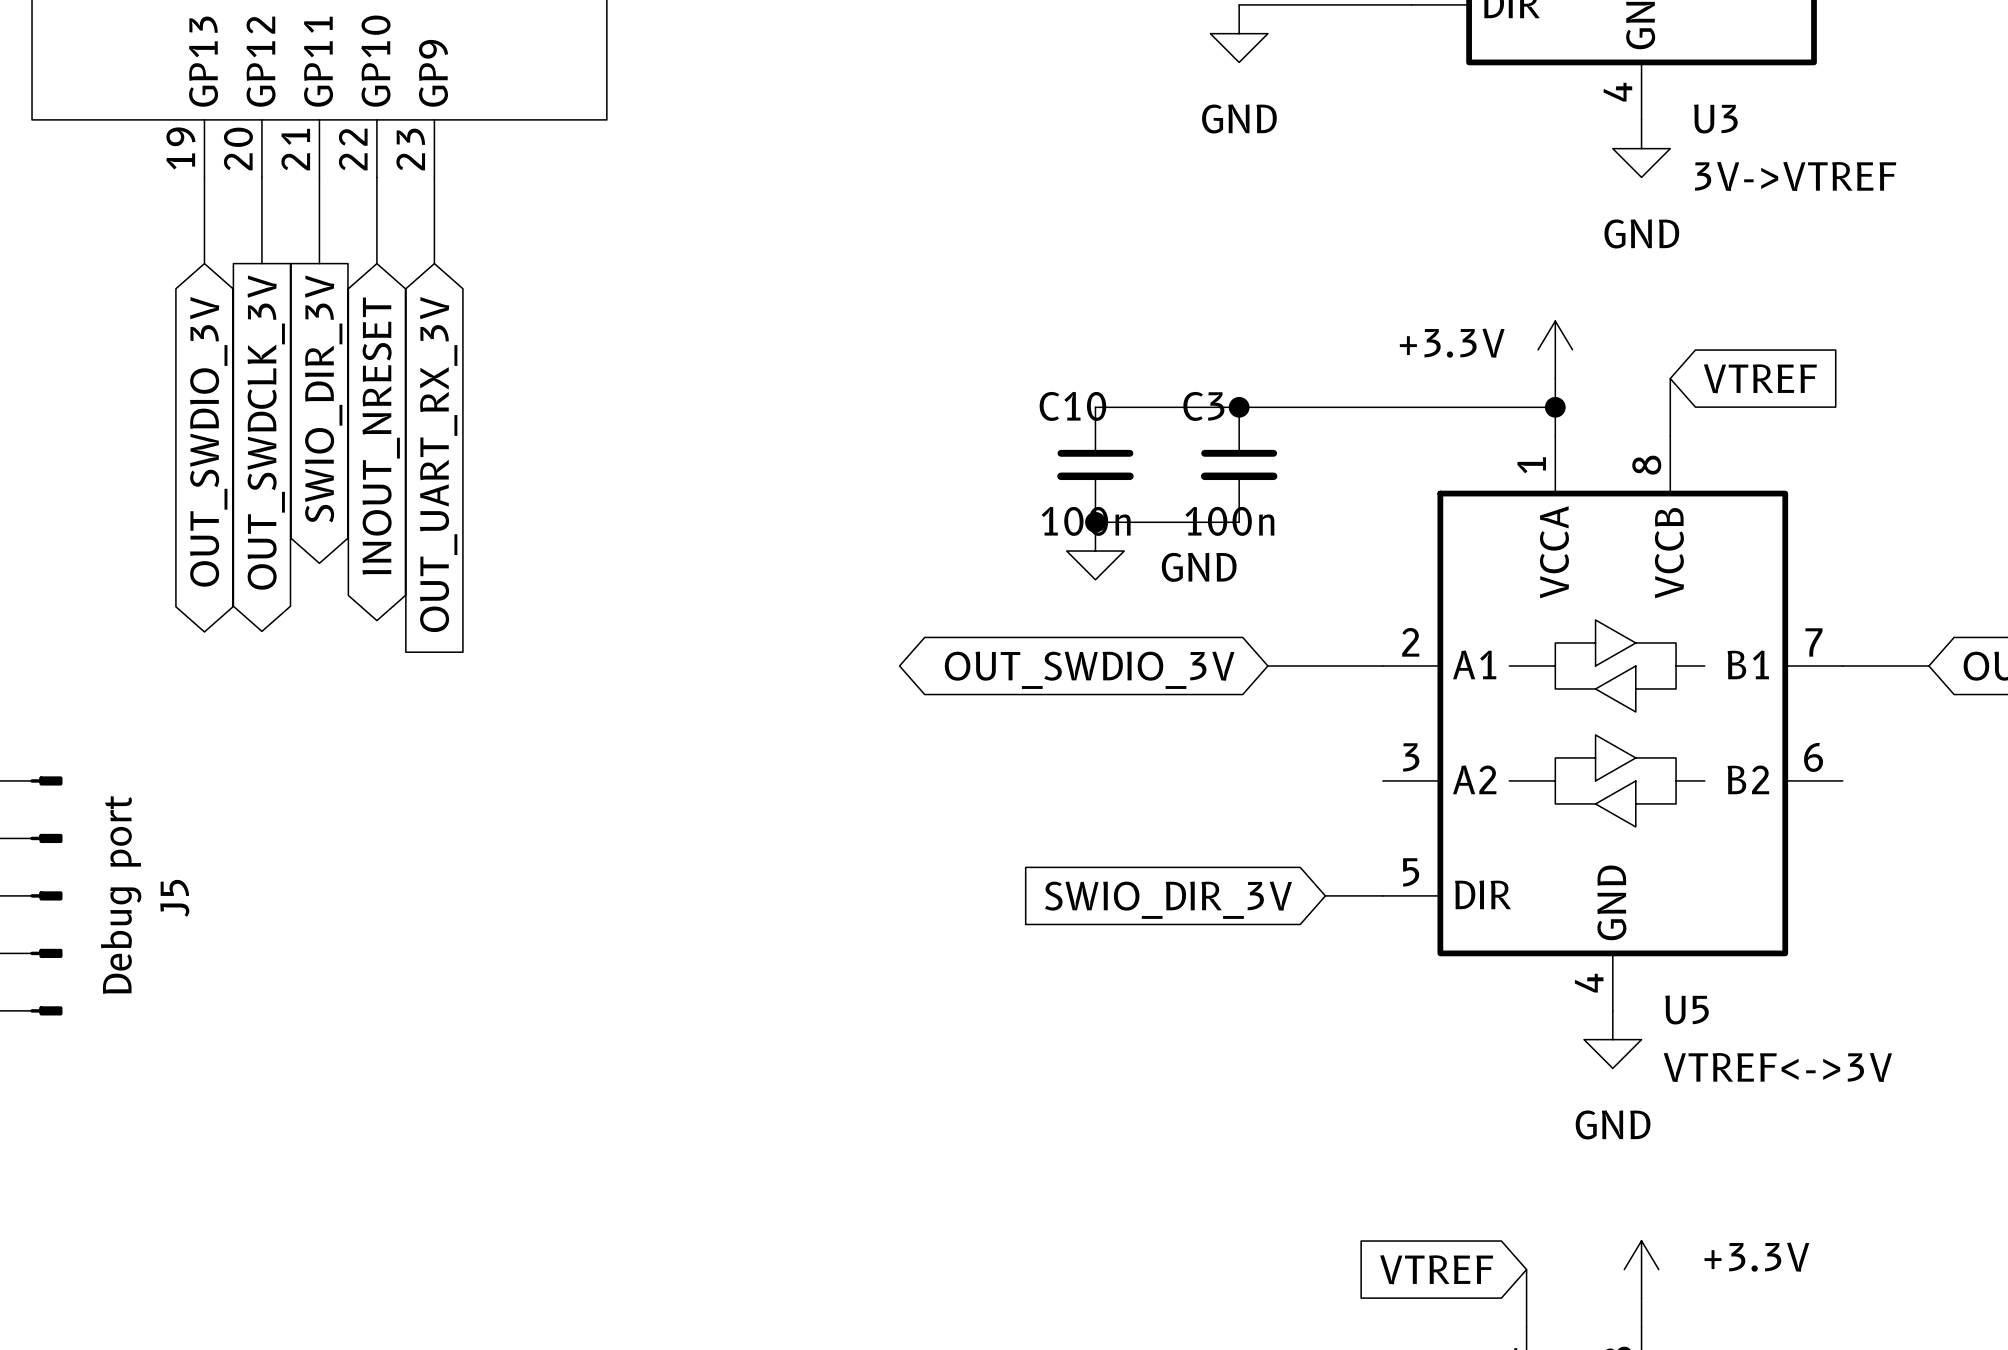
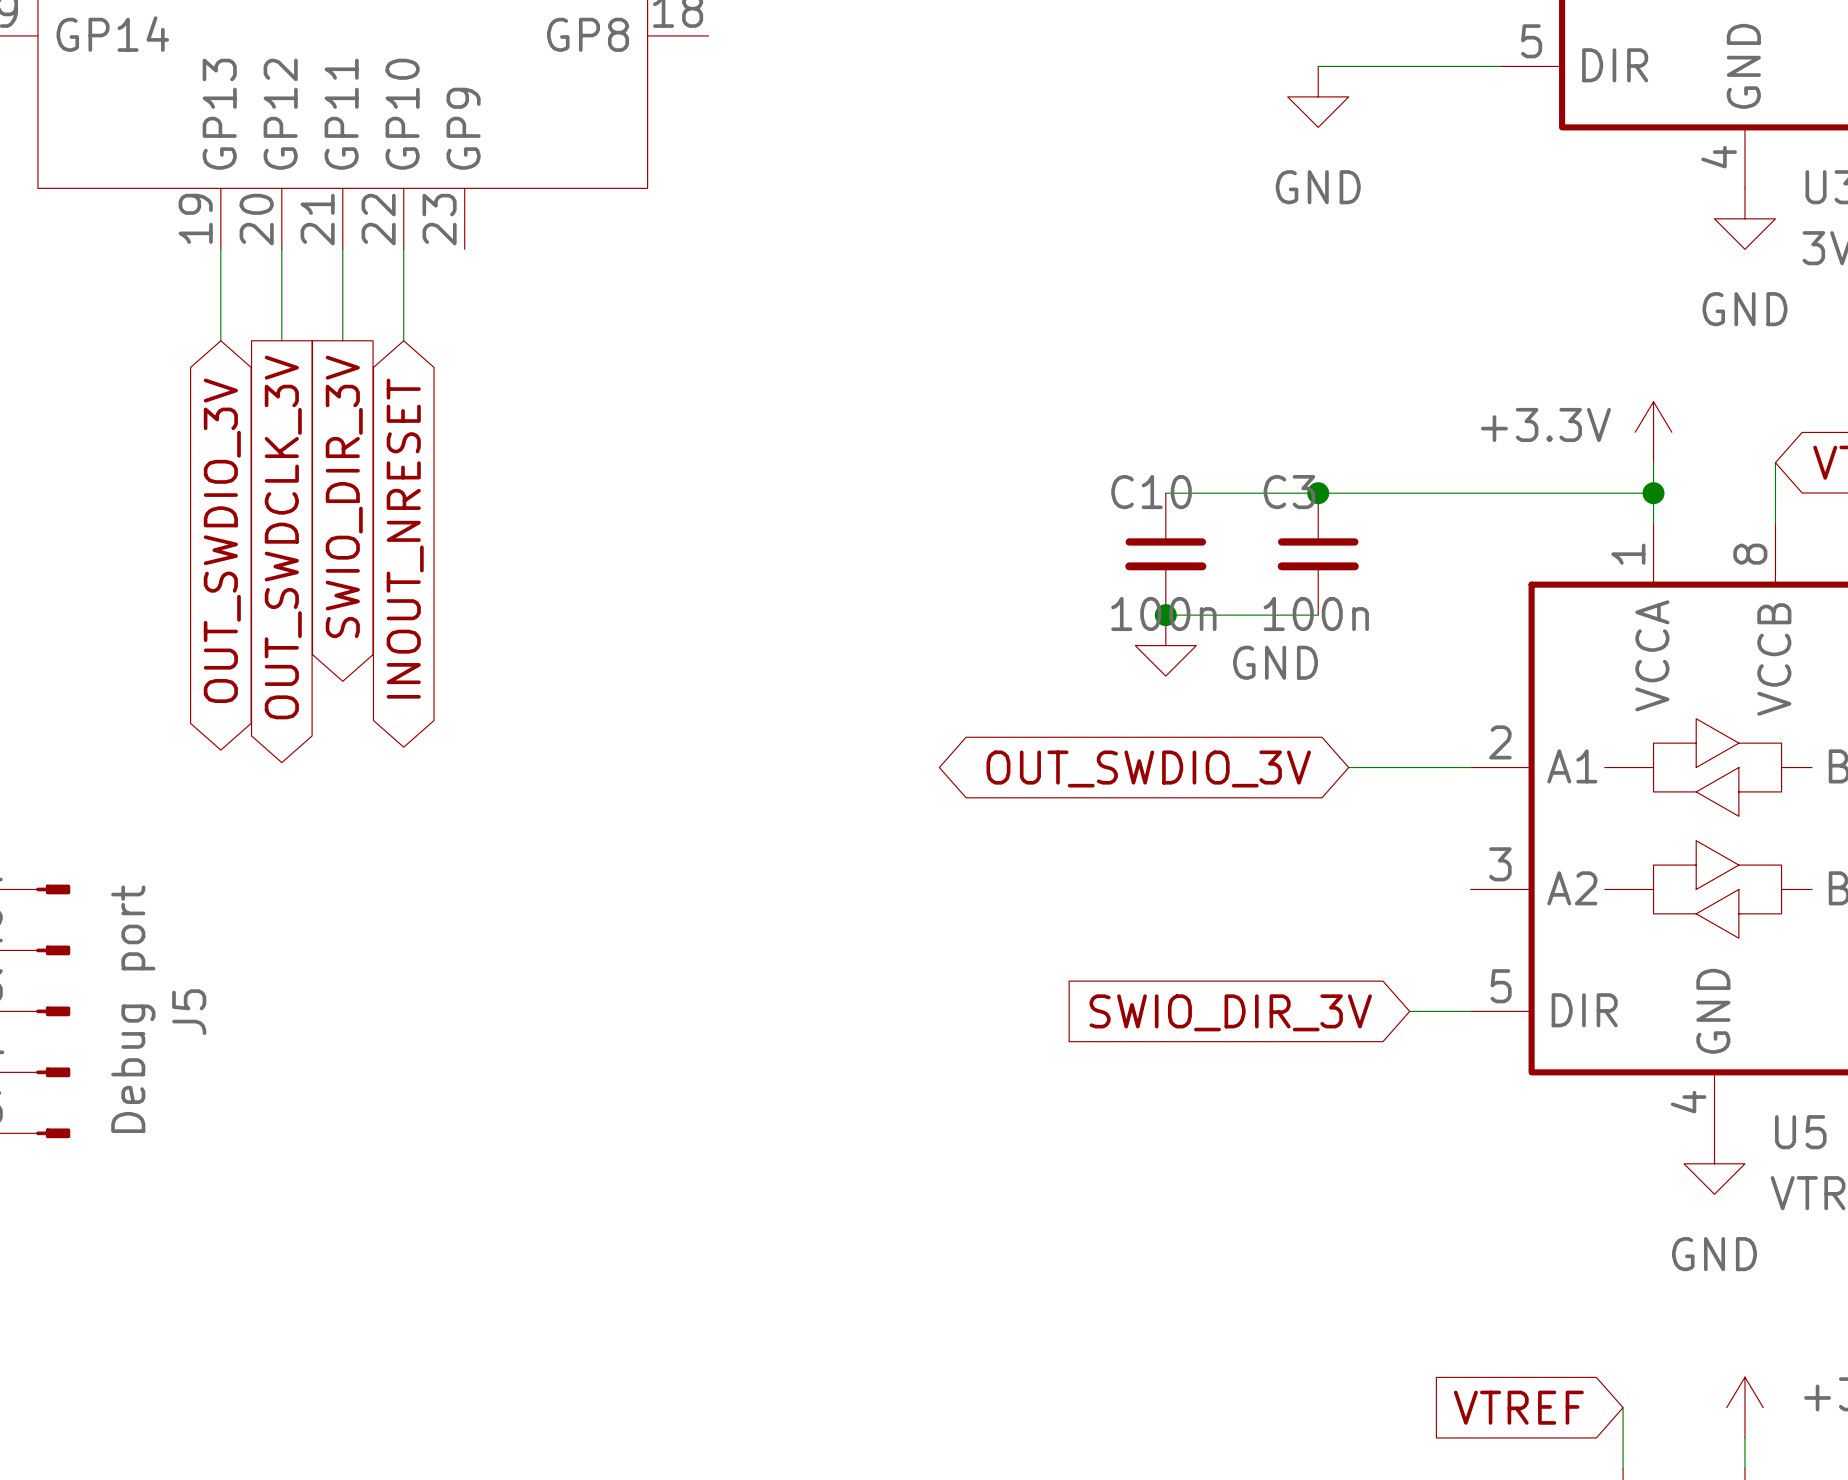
wire: (434, 177) (434, 263) -> none
global label: OUT_UART_RX_3V (438, 464) -> none

